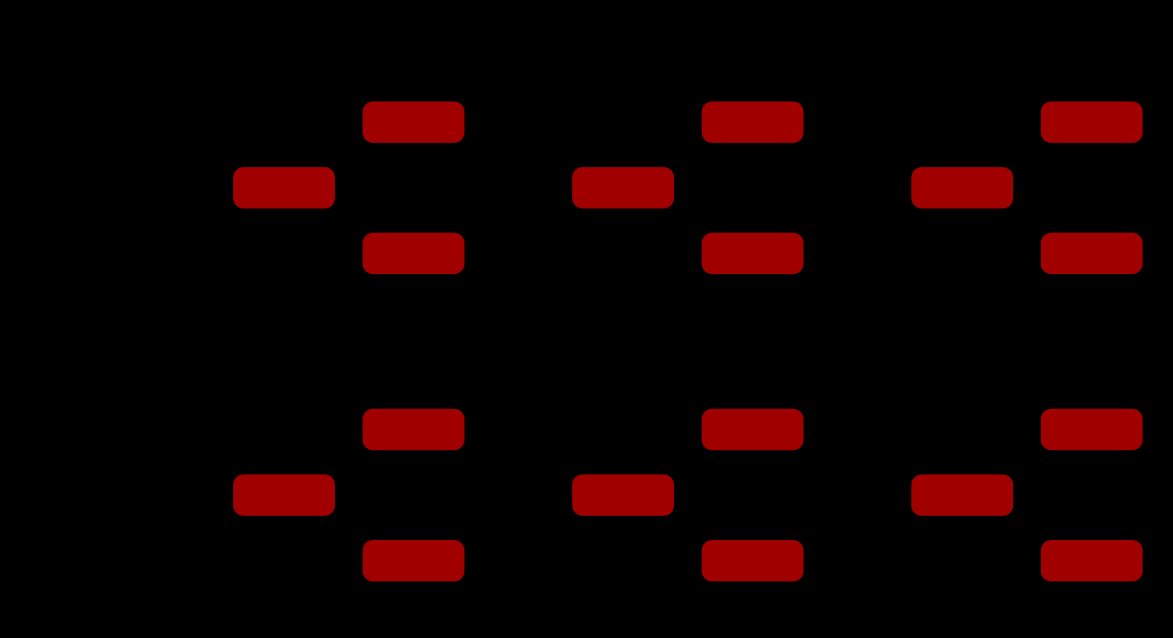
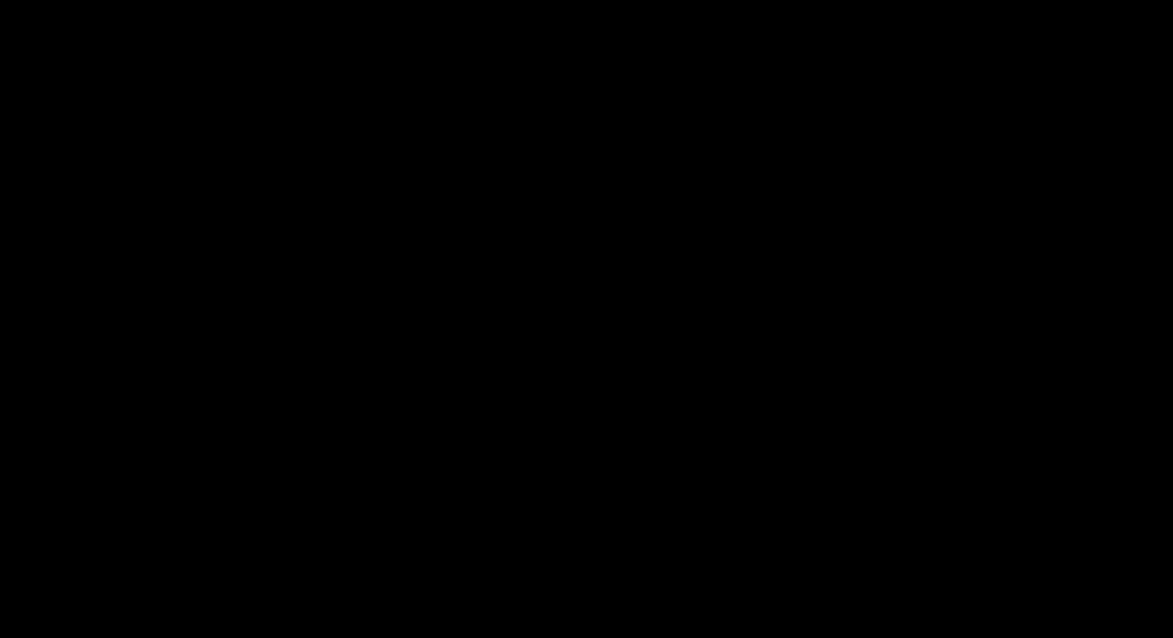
part: (348, 187) -> none
part: (687, 187) -> none
part: (1026, 187) -> none
part: (348, 495) -> none
part: (687, 495) -> none
part: (1026, 495) -> none

